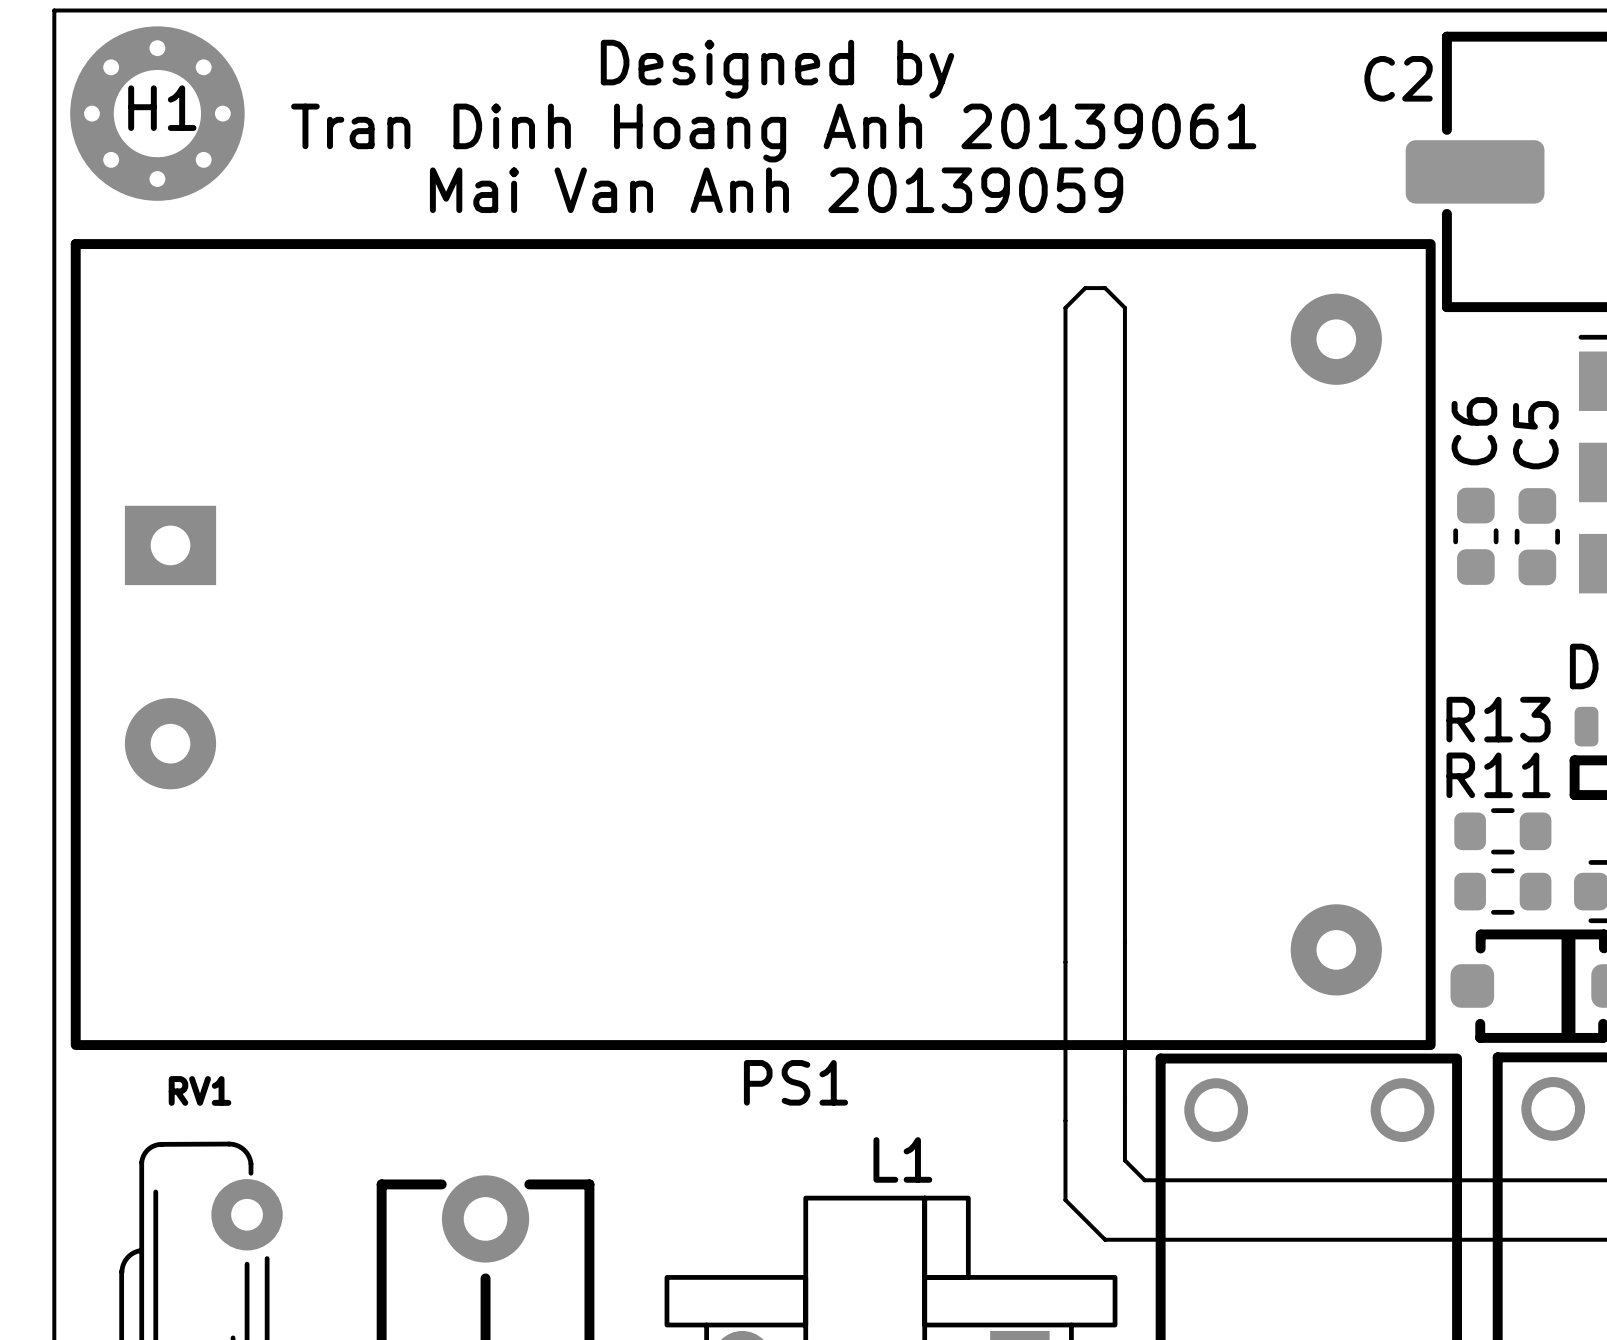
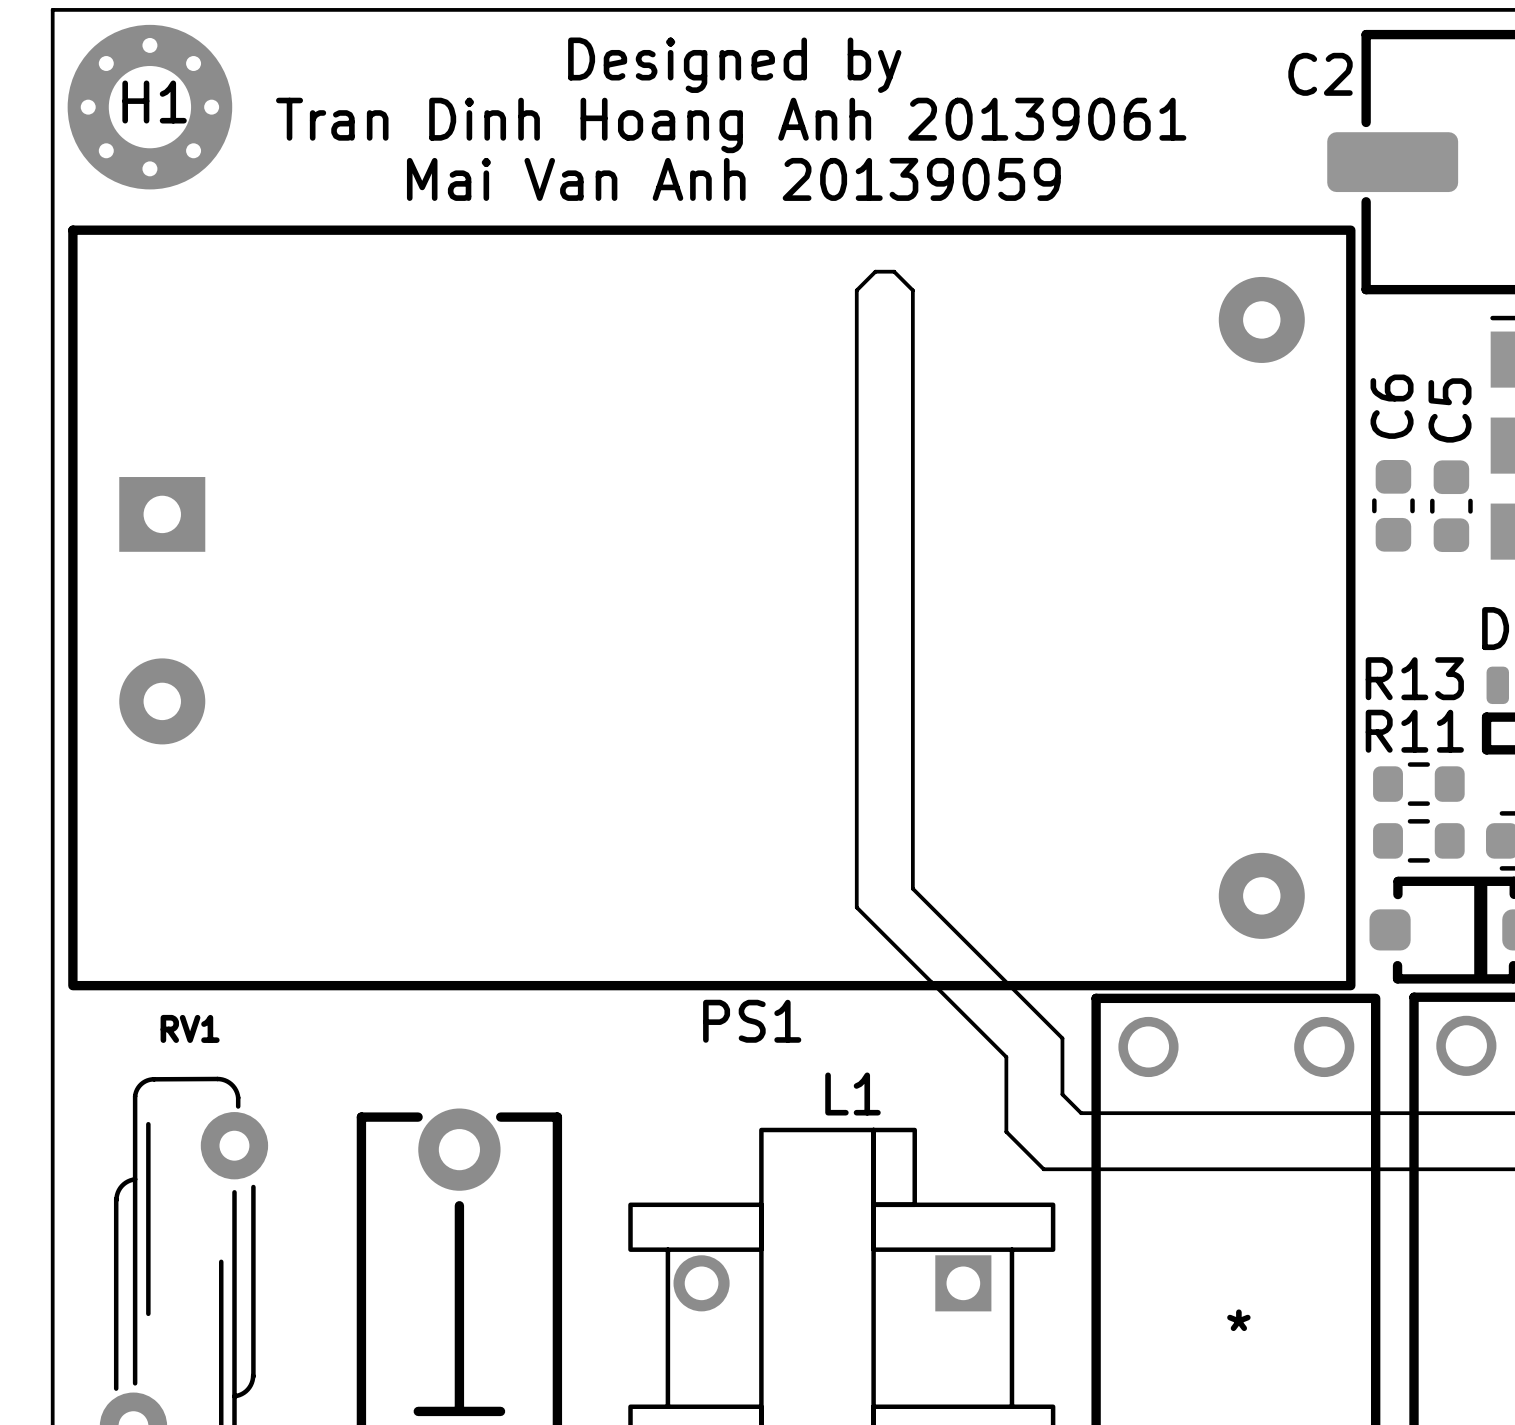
board edge: (1124, 1100) (1124, 307) (1105, 288) (1085, 288) (1065, 307) (1065, 1120) -> (1062, 1038) (912, 888) (912, 290) (894, 271) (875, 271) (856, 290) (856, 907) (1006, 1057)

